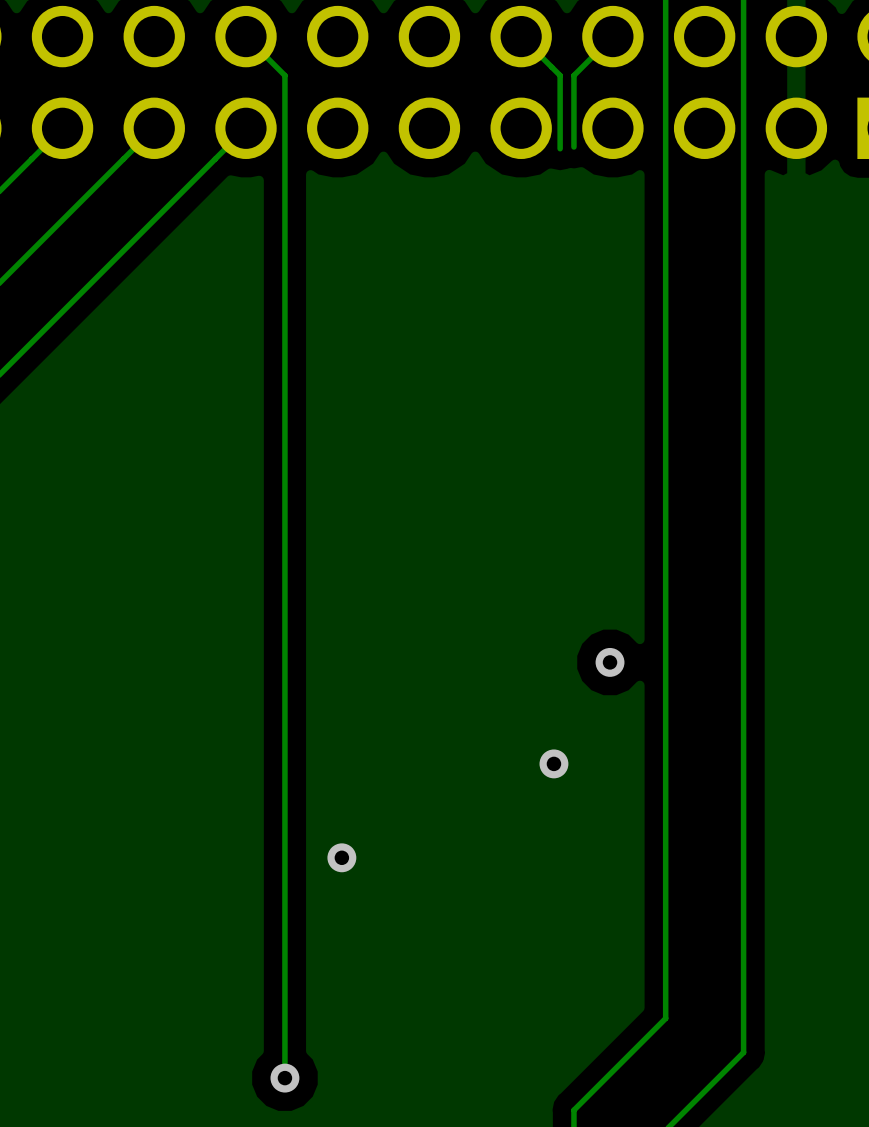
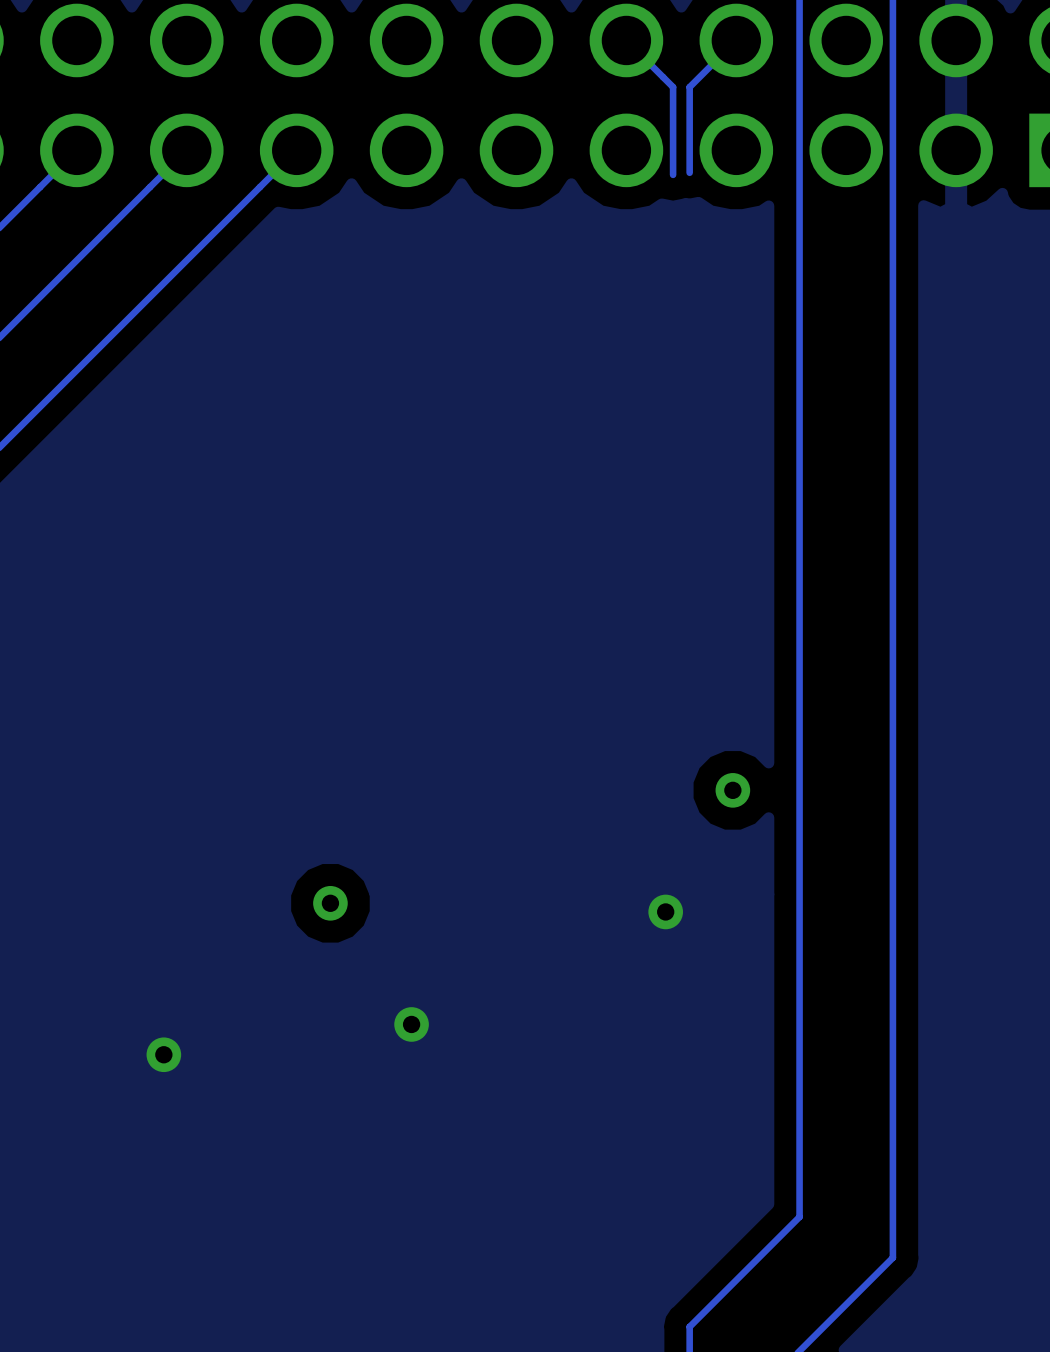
track: (245, 36) (284, 75) (284, 1078) -> none
via: none -> (330, 903)
via: none -> (163, 1054)
via: (284, 1078) -> none

